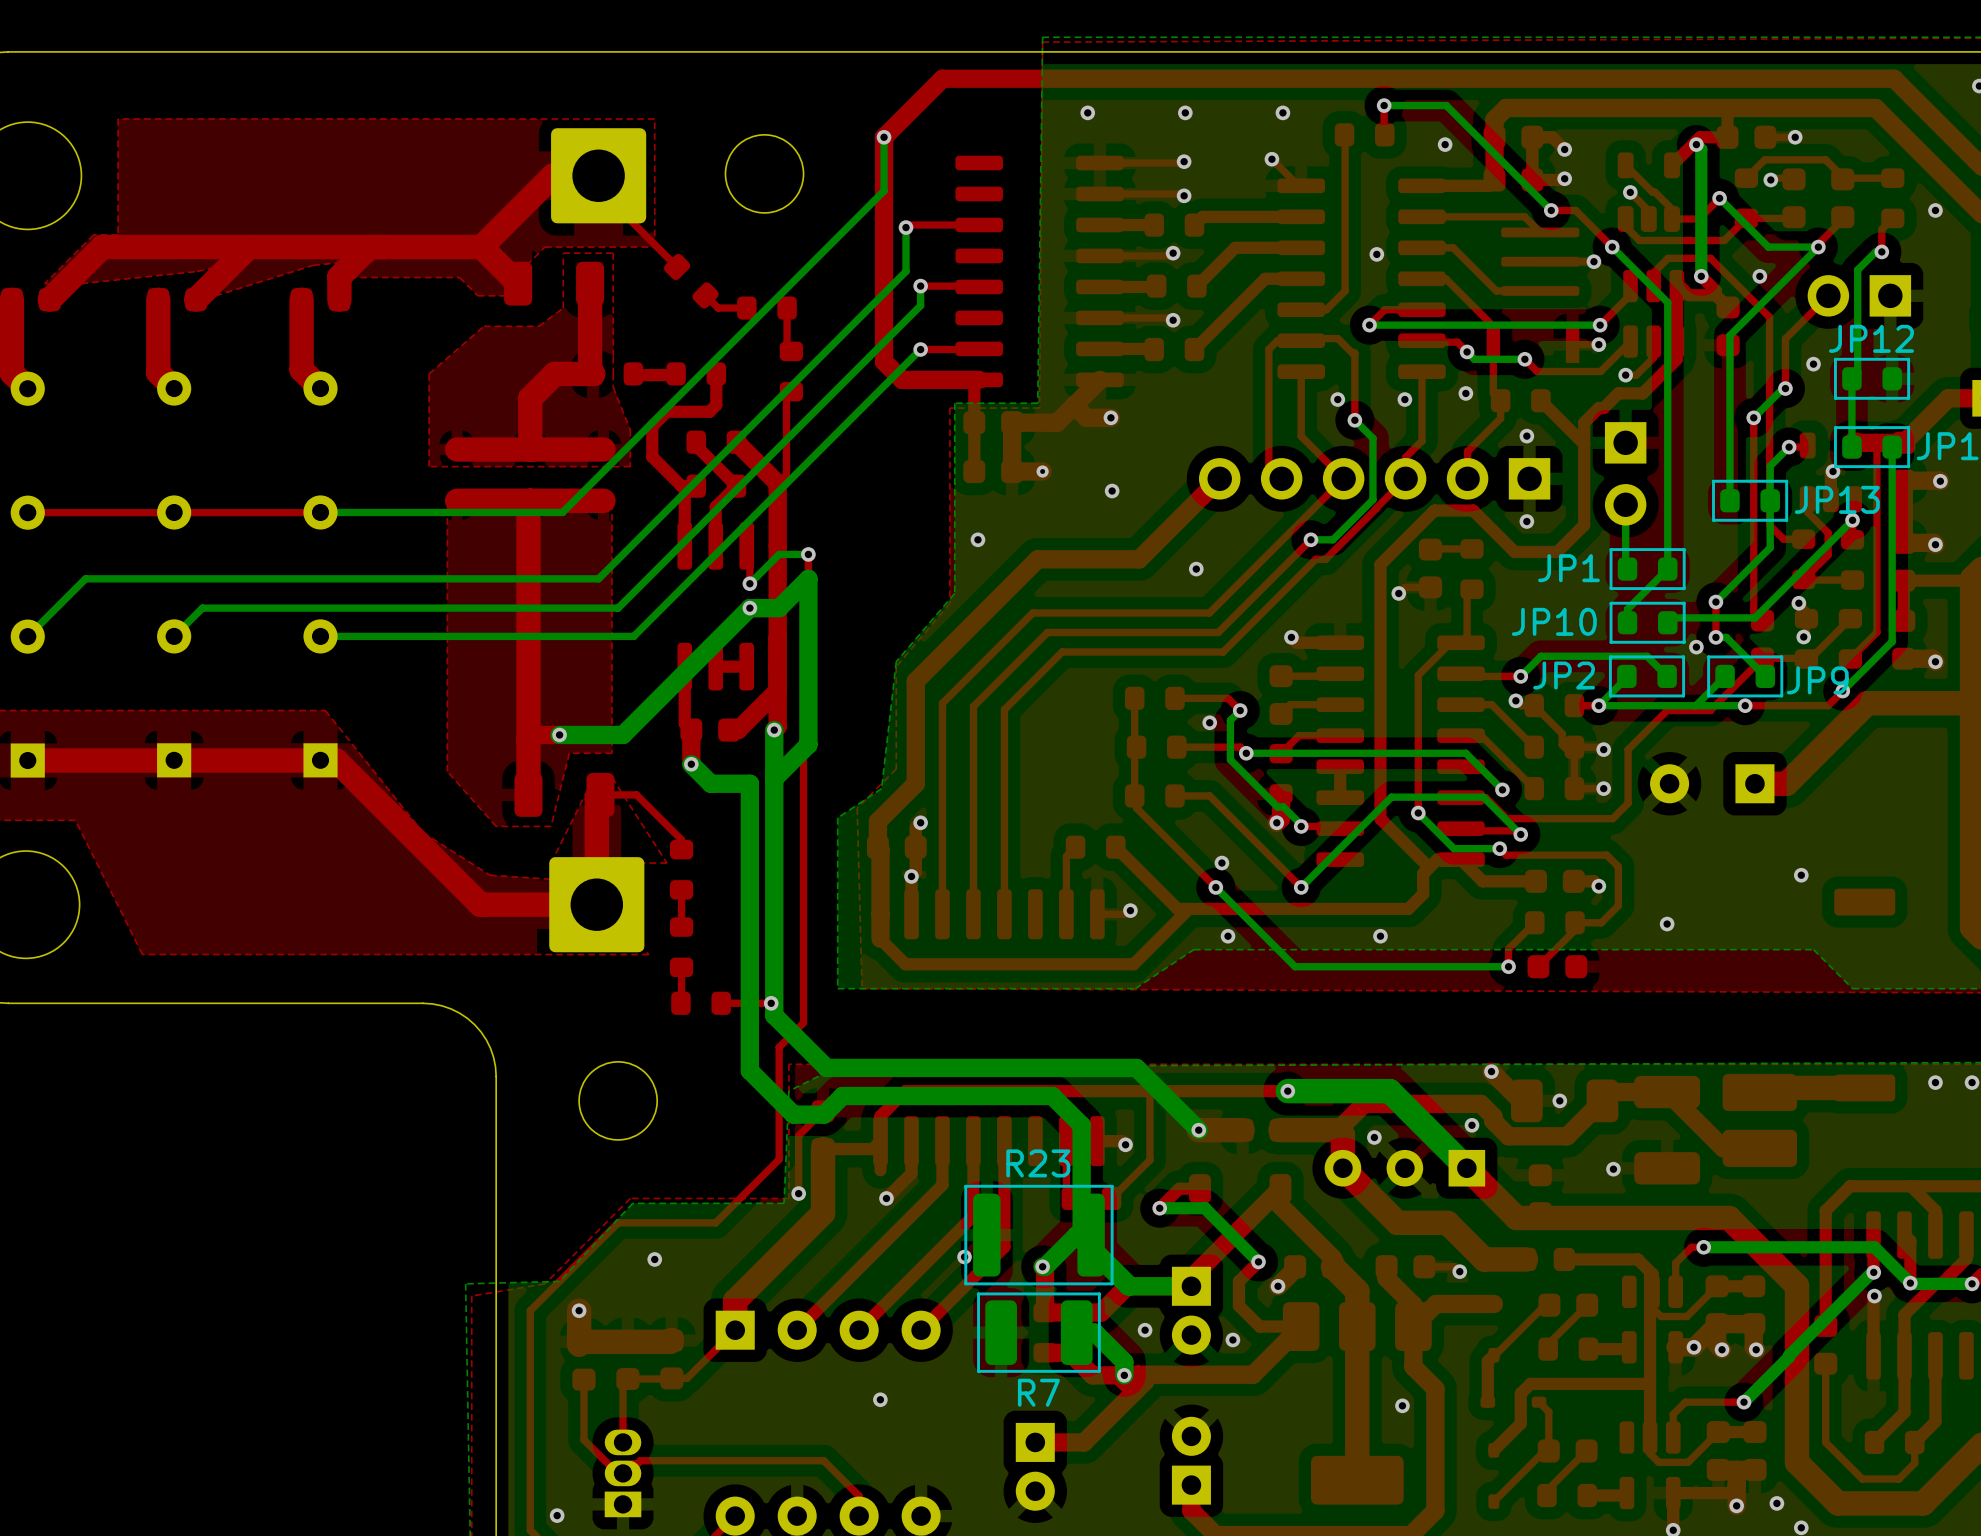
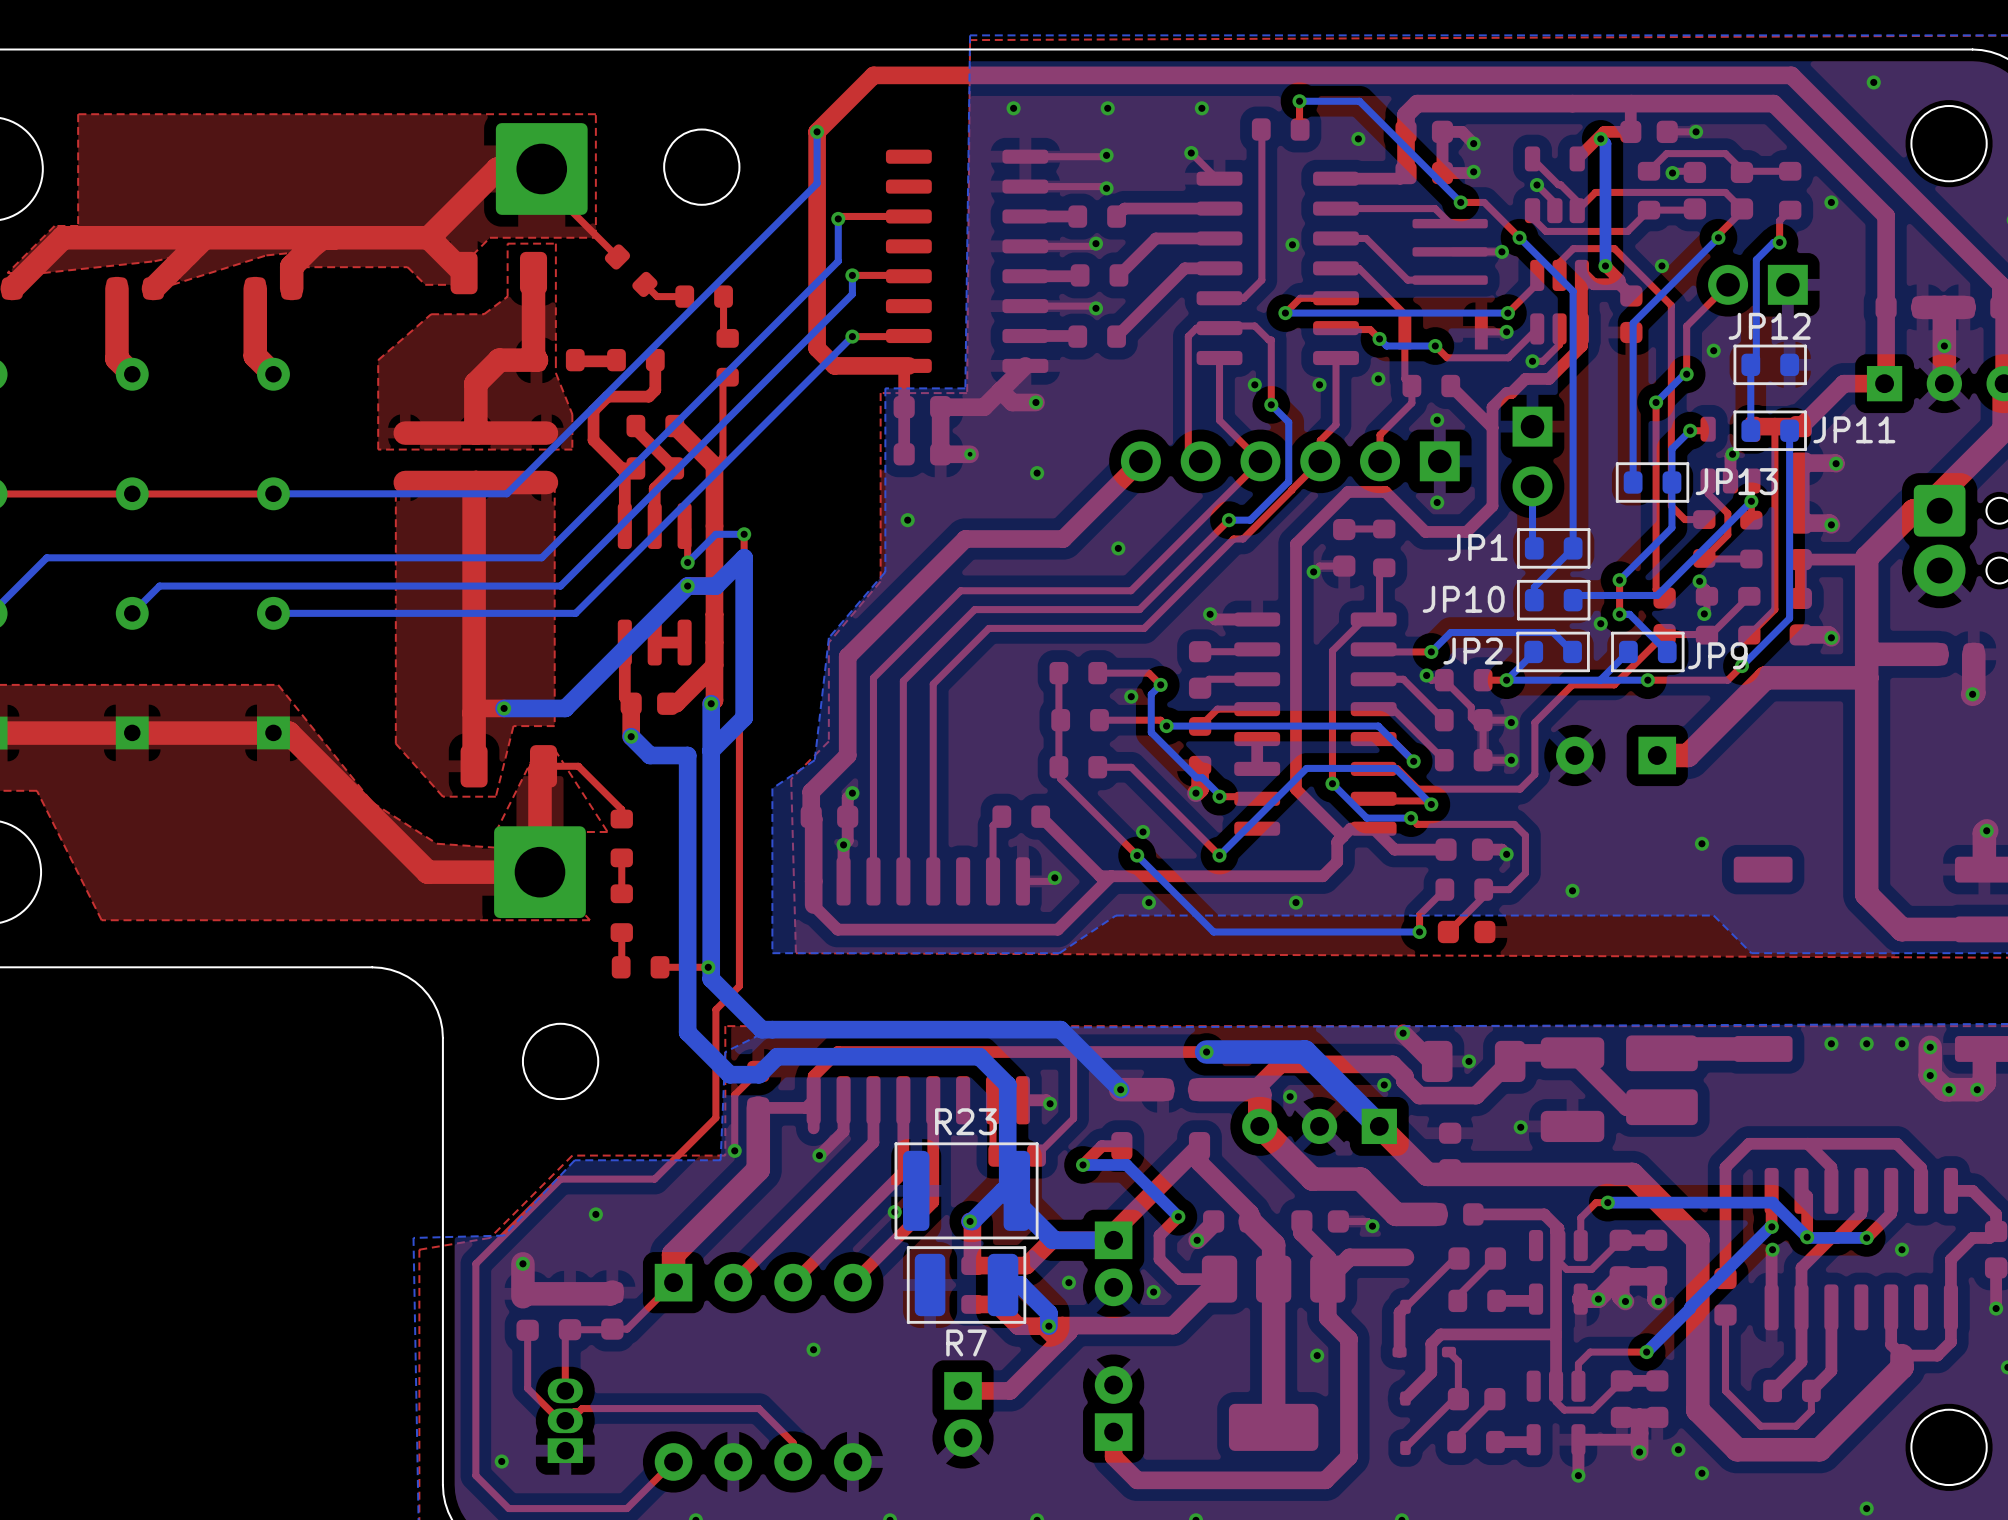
top track: (1719, 198) (1698, 219) (1672, 219) -> (1743, 210) (1725, 192) (1595, 192) (1577, 210)
bottom track: (1719, 198) (1768, 247) (1818, 247) -> none
via: (1719, 198) -> none

